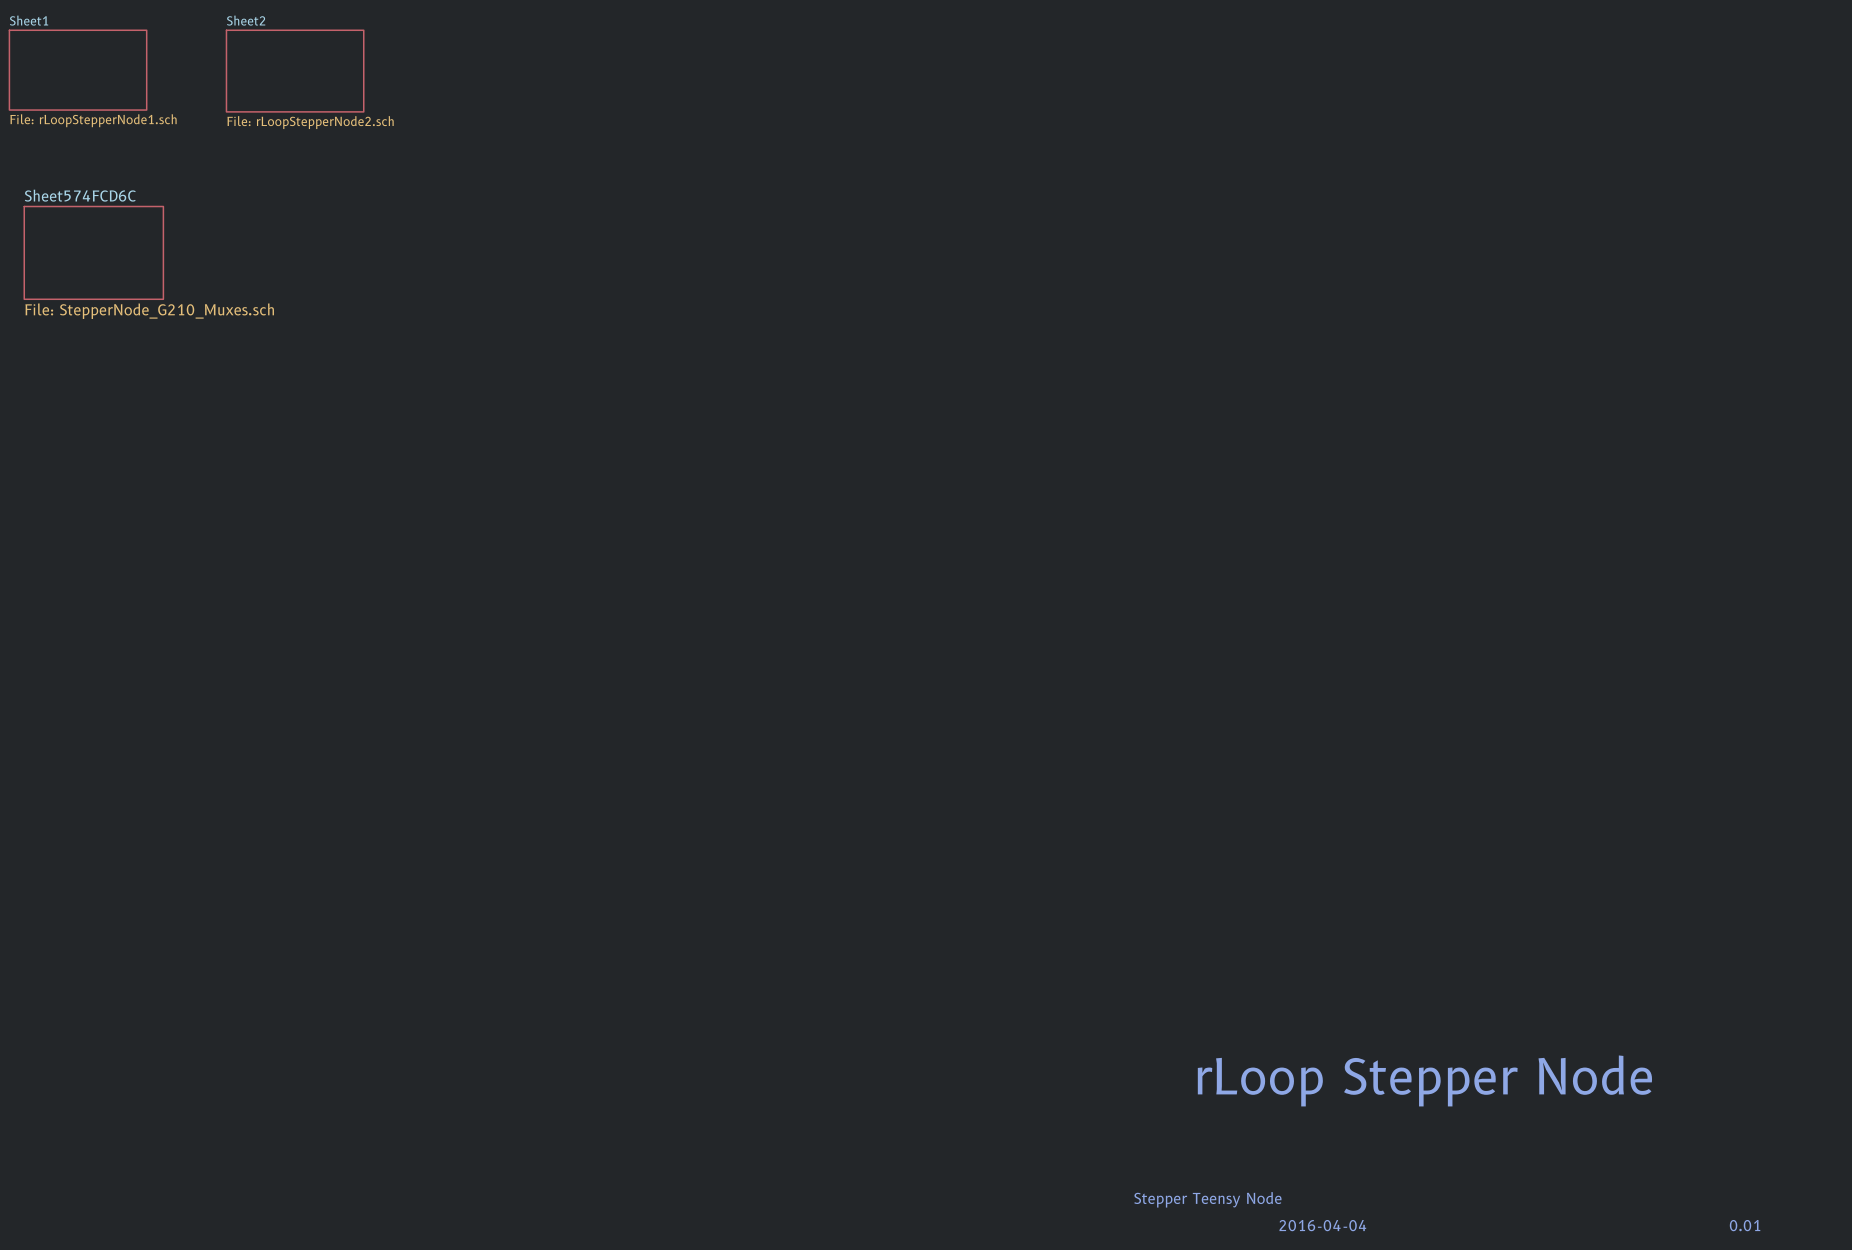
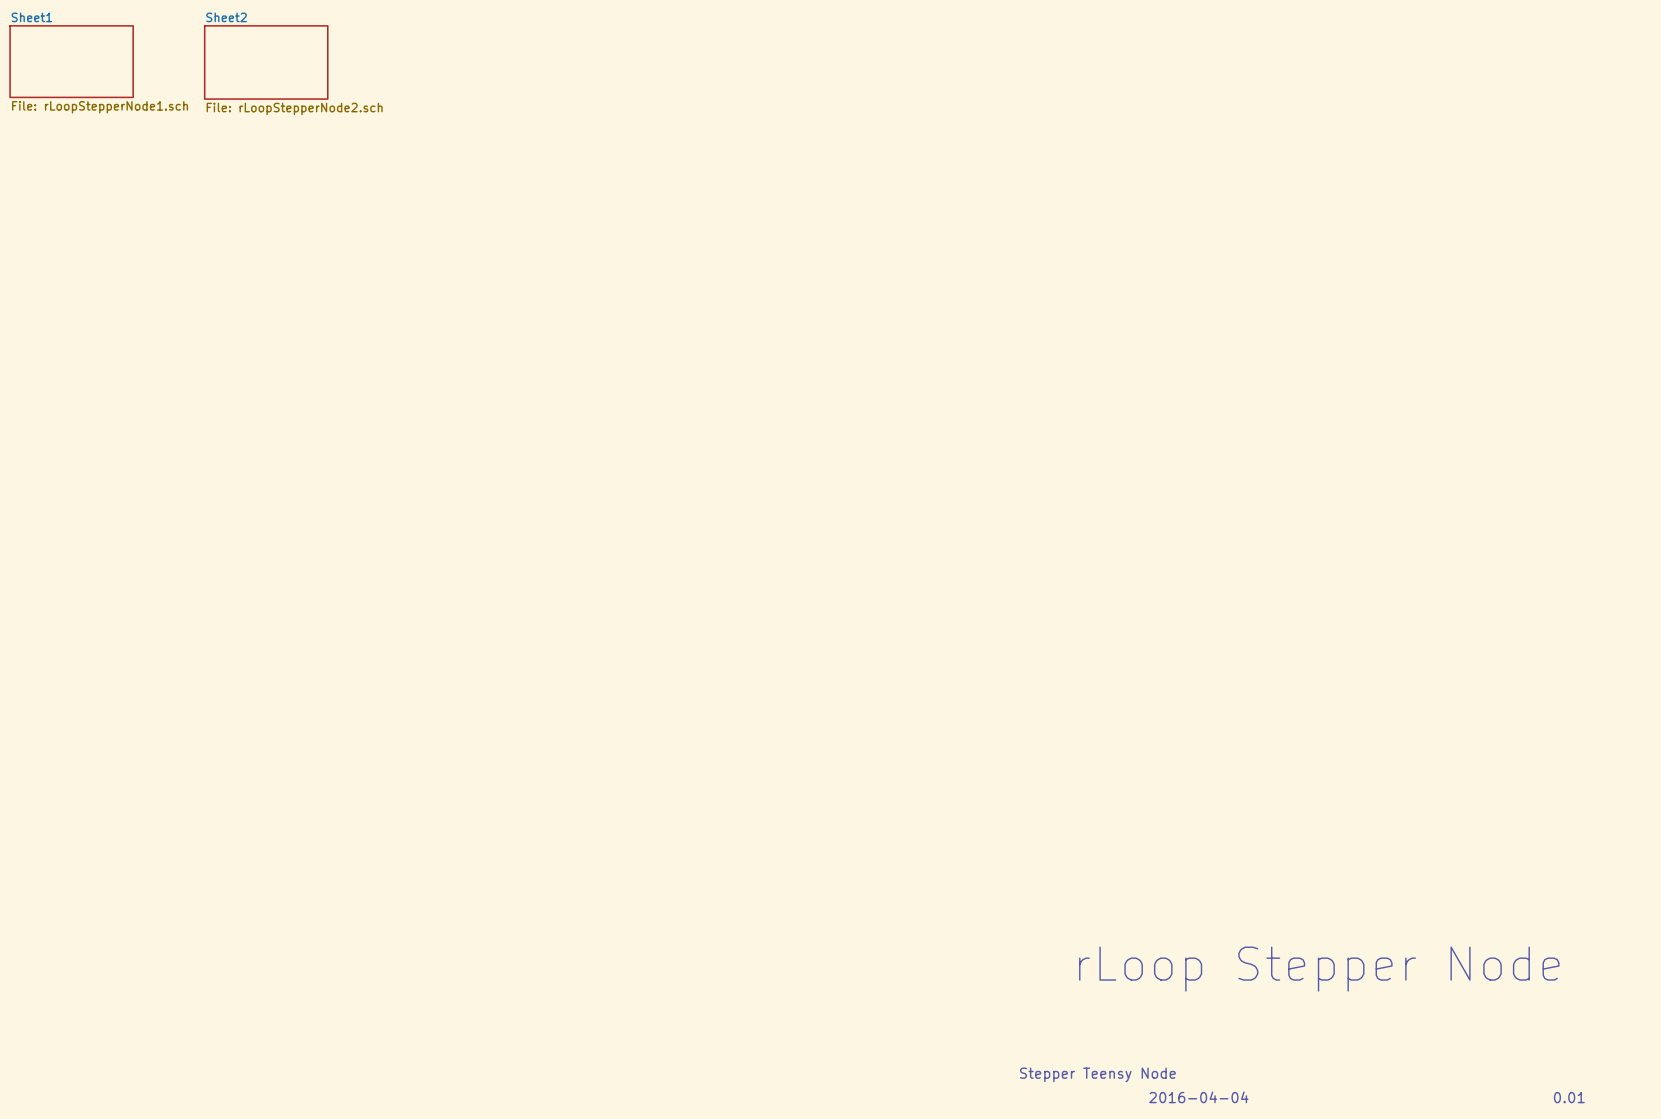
sheet Sheet574FCD6C: File: StepperNode_G210_Muxes.sch (93, 252) -> none

